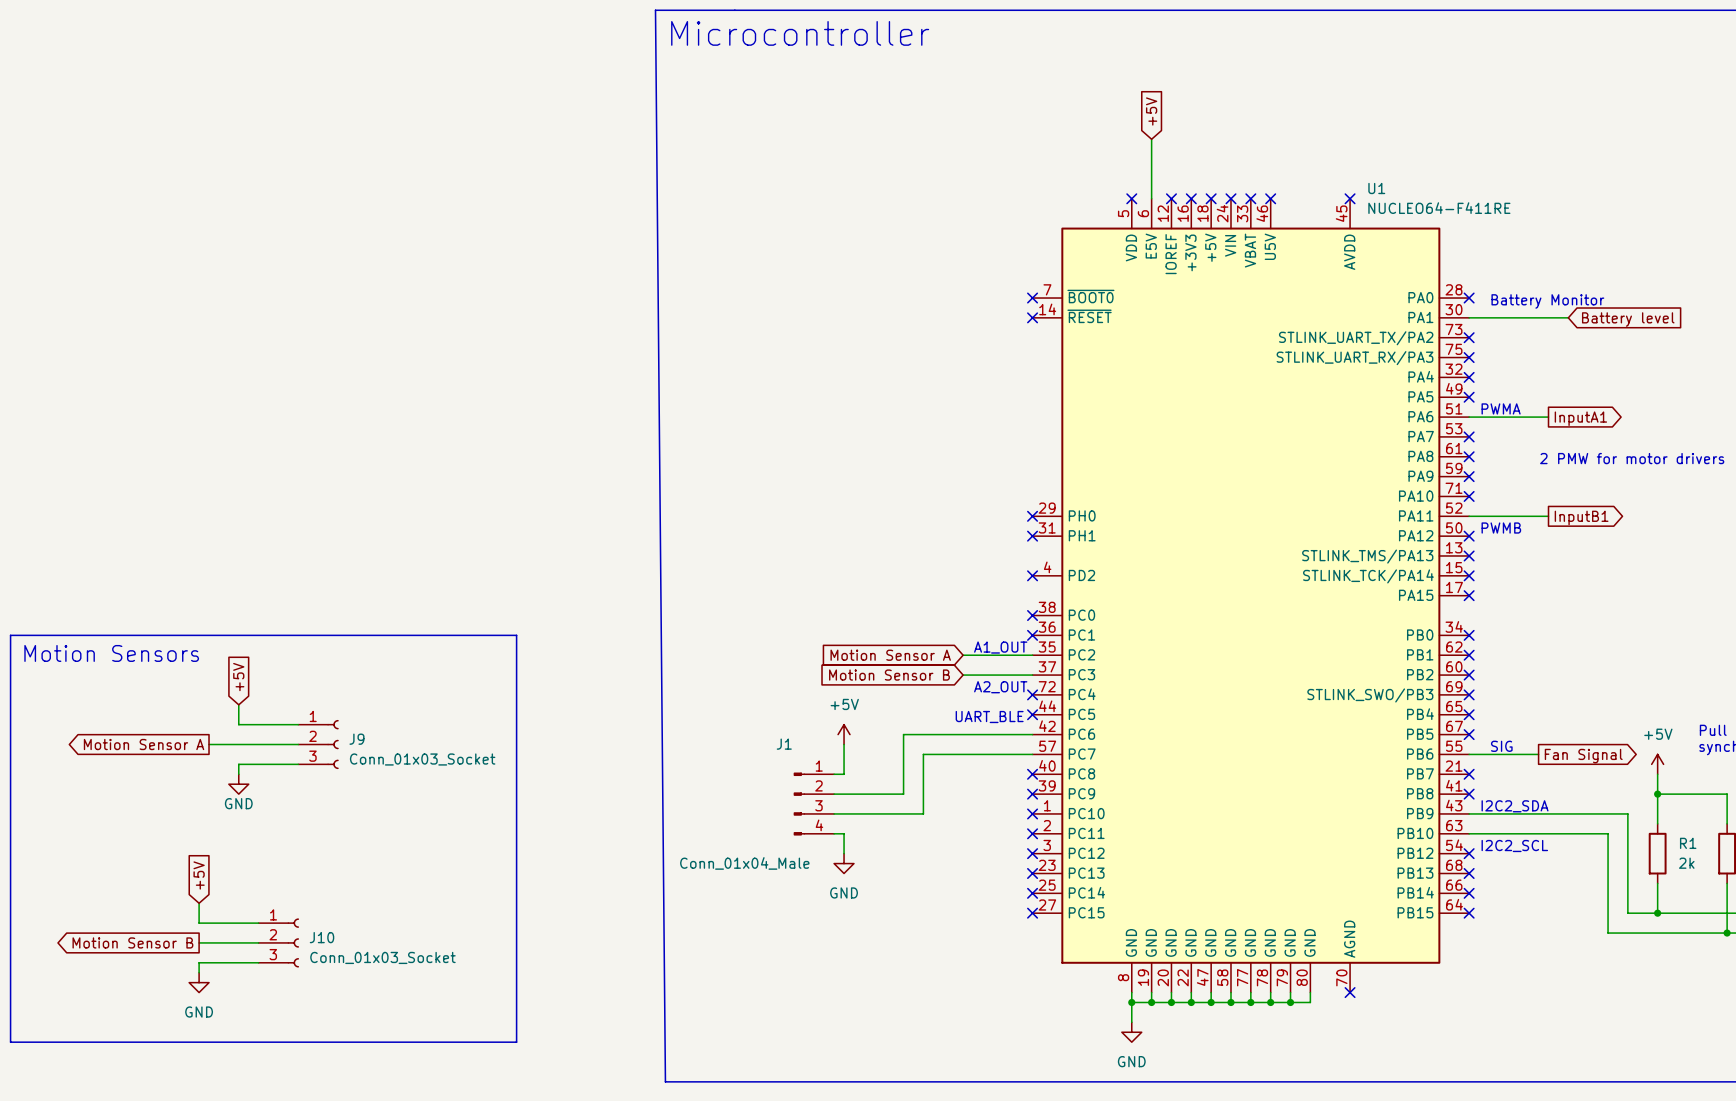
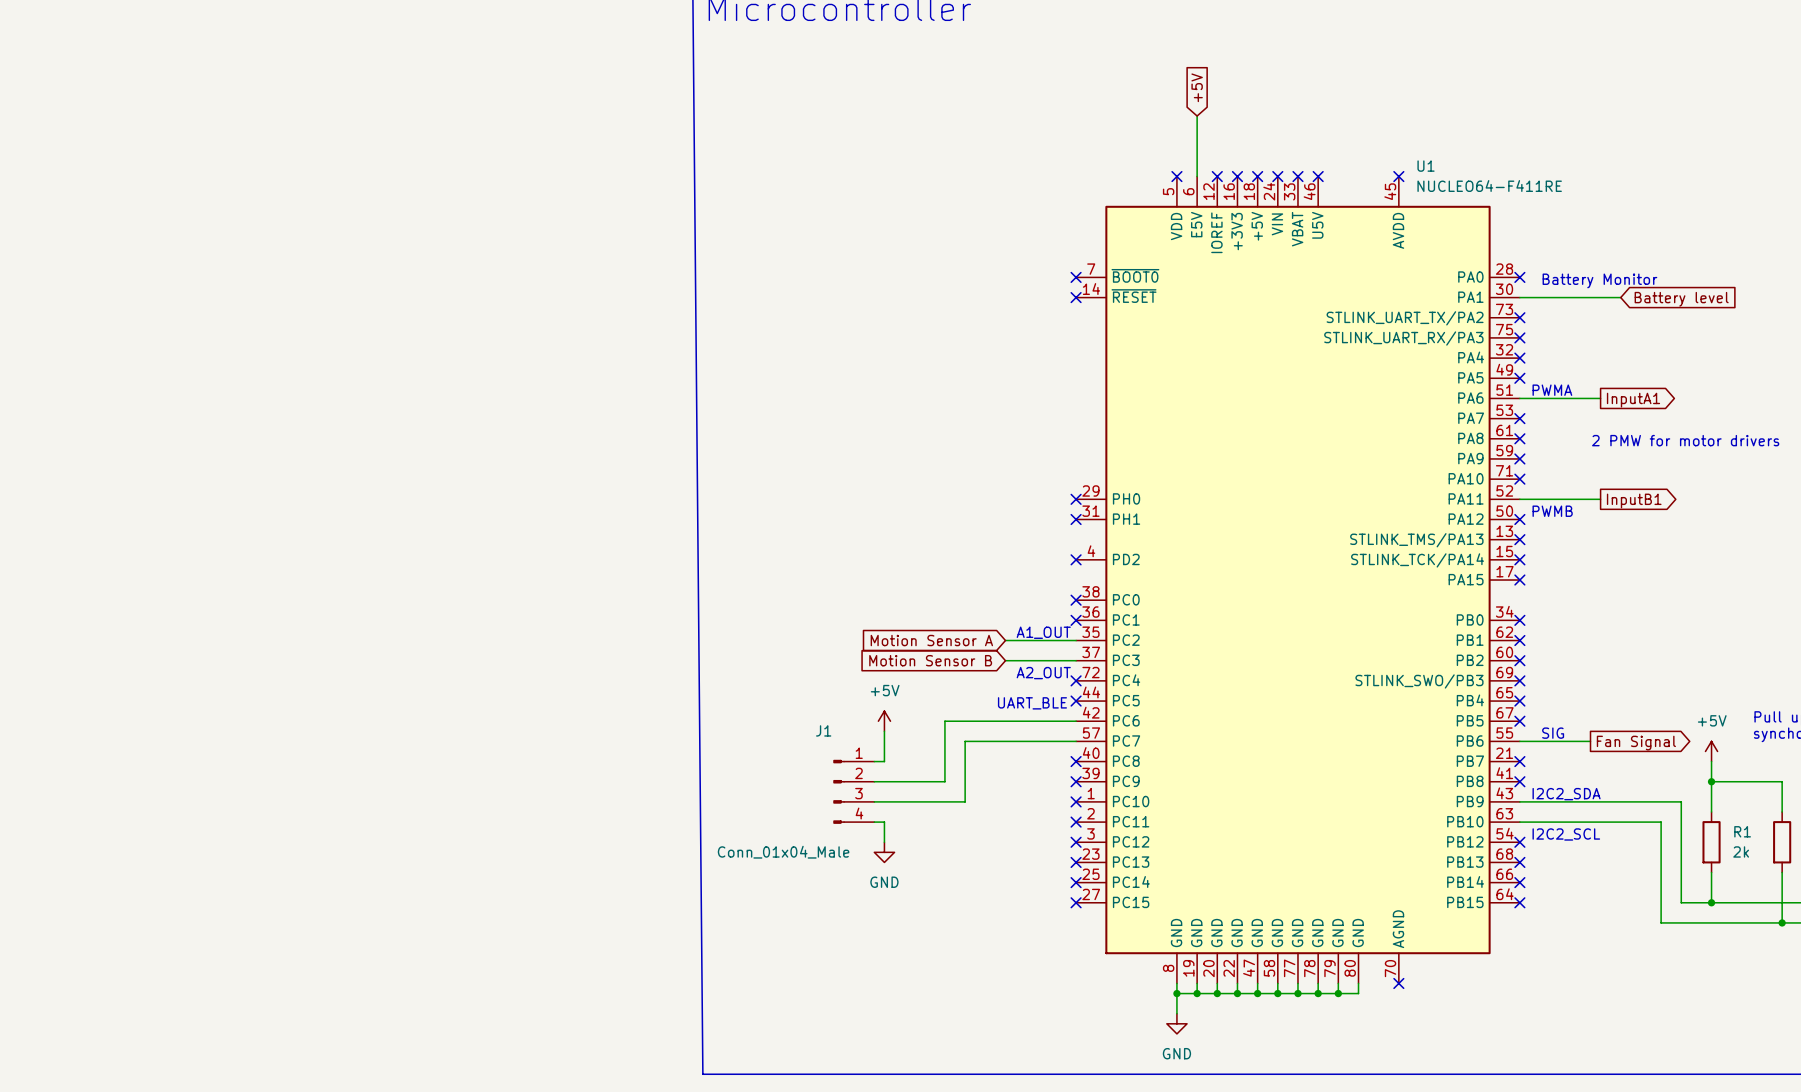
line: (10, 635) (516, 635) (516, 1042) (10, 1042) (10, 635) -> none
text: Motion Sensors (111, 653) -> none
global label: +5V (238, 677) -> none
wire: (238, 704) (238, 724) (298, 724) -> none
global label: Motion Sensor A (144, 744) -> none
wire: (209, 744) (298, 744) -> none
J9: Conn_01x03_Socket (318, 744) -> none
wire: (298, 764) (238, 764) (238, 774) -> none
power symbol: GND (238, 784) -> none
global label: +5V (199, 875) -> none
wire: (199, 903) (199, 923) (258, 923) -> none
global label: Motion Sensor B (132, 942) -> none
wire: (199, 942) (258, 942) -> none
J10: Conn_01x03_Socket (278, 942) -> none
wire: (258, 962) (199, 962) (199, 972) -> none
power symbol: GND (199, 982) -> none

